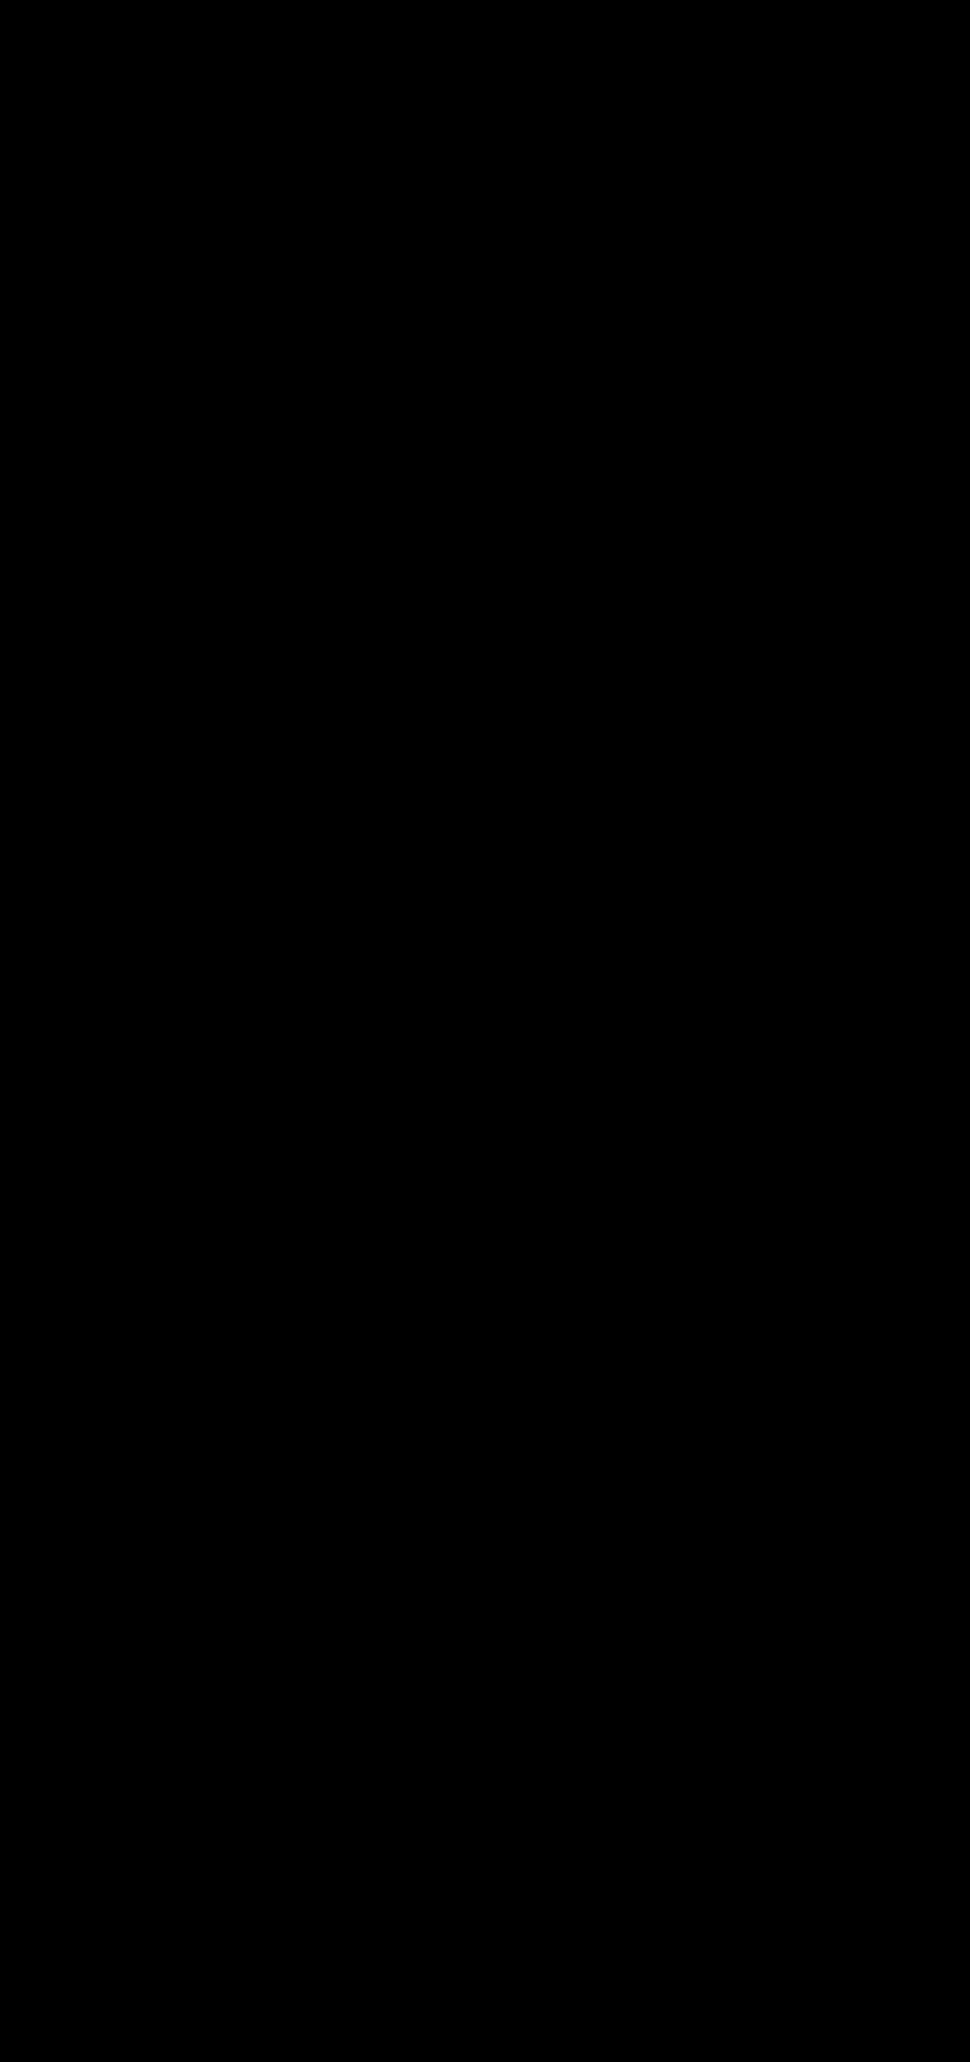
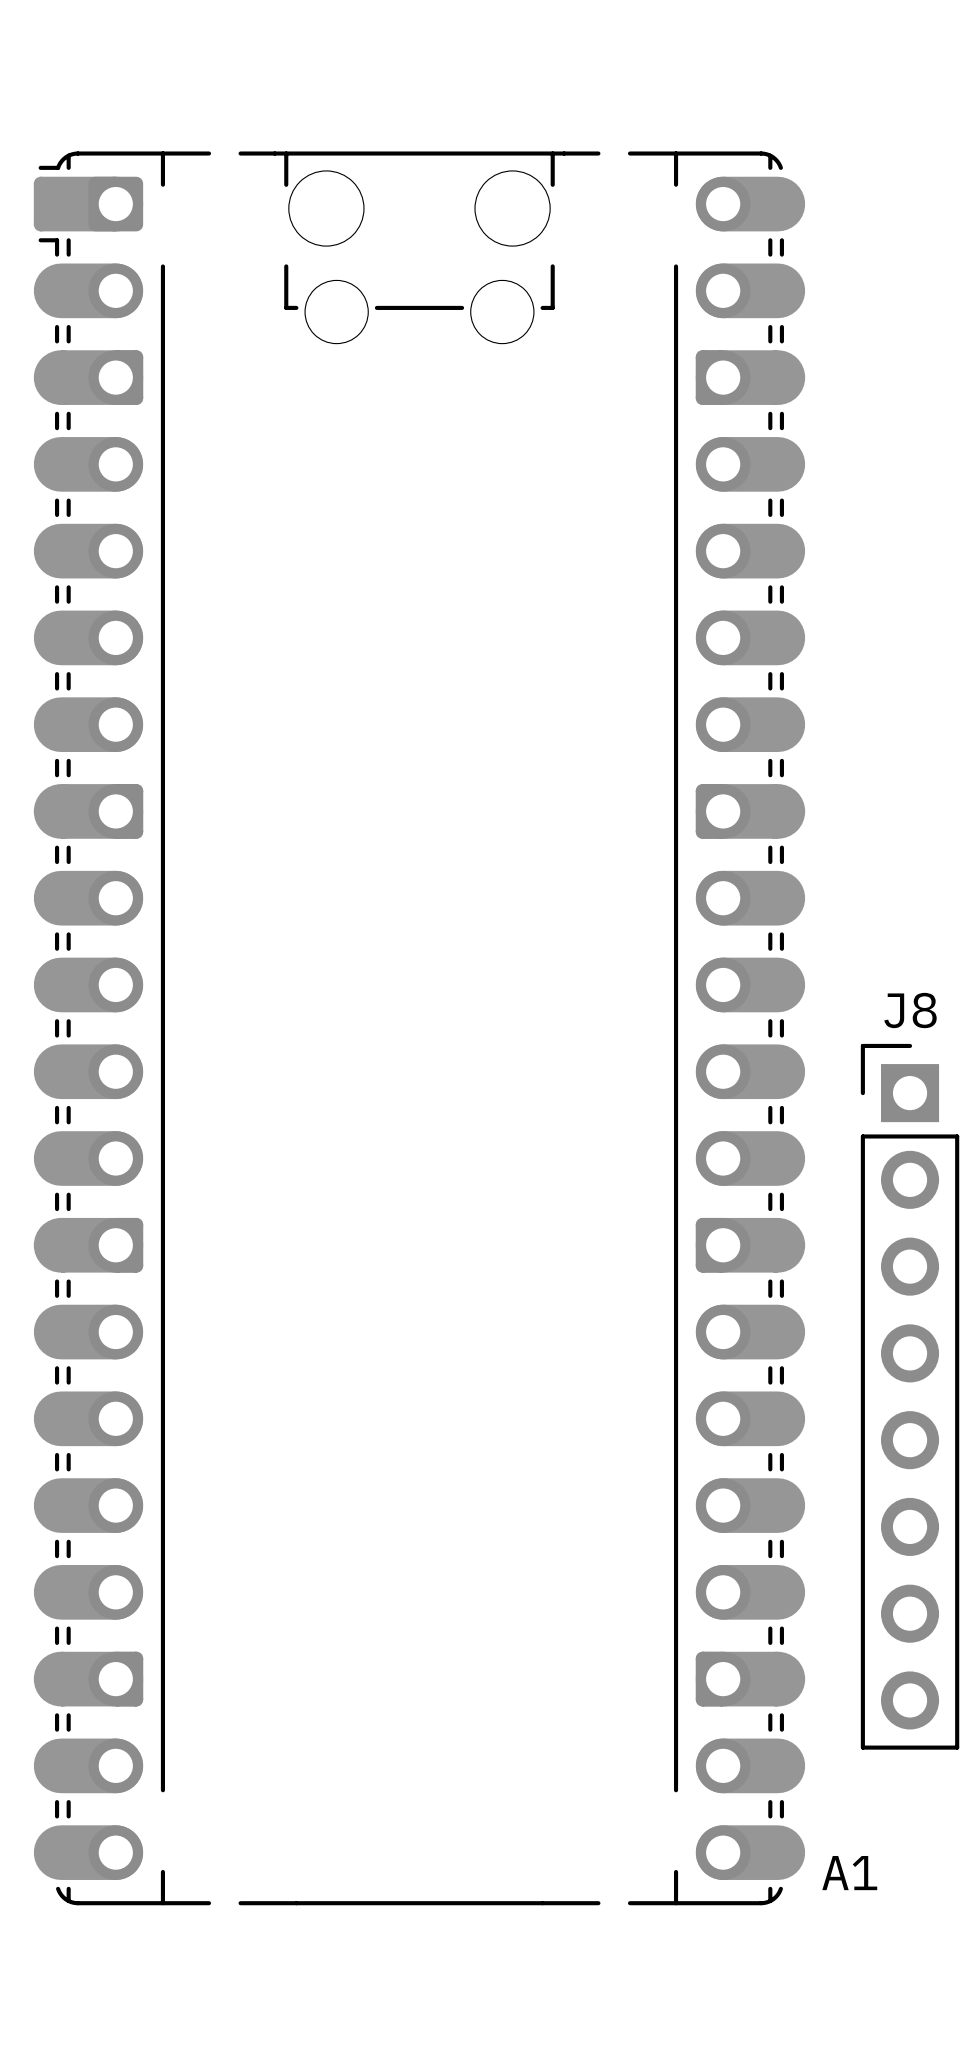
A1: none -> (419, 1028)
J8: none -> (910, 1396)

